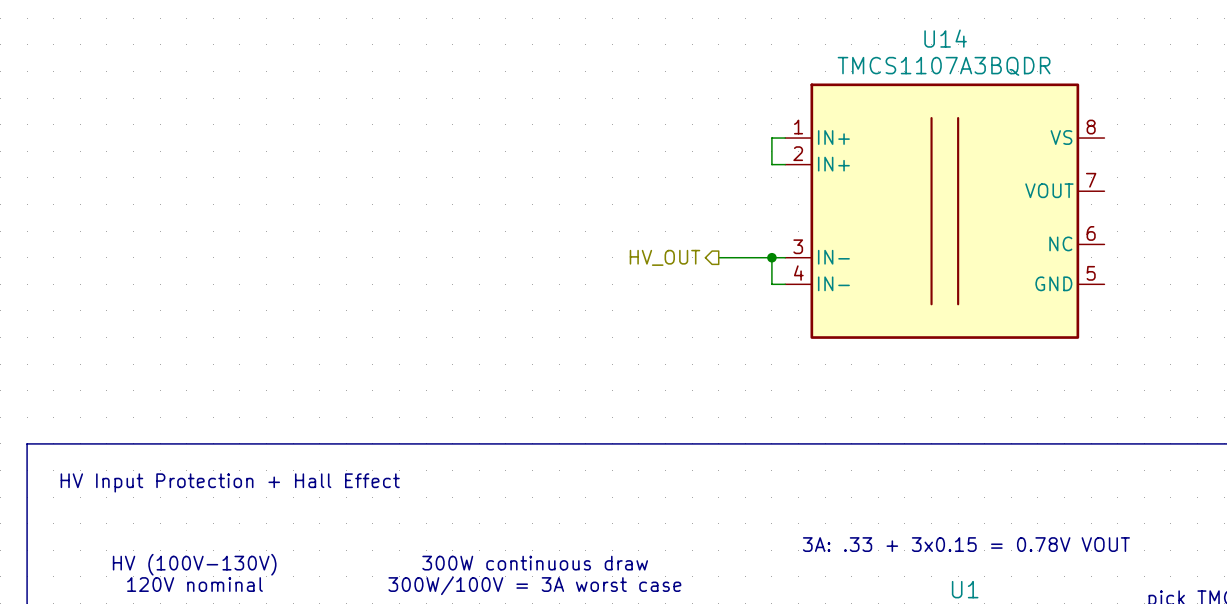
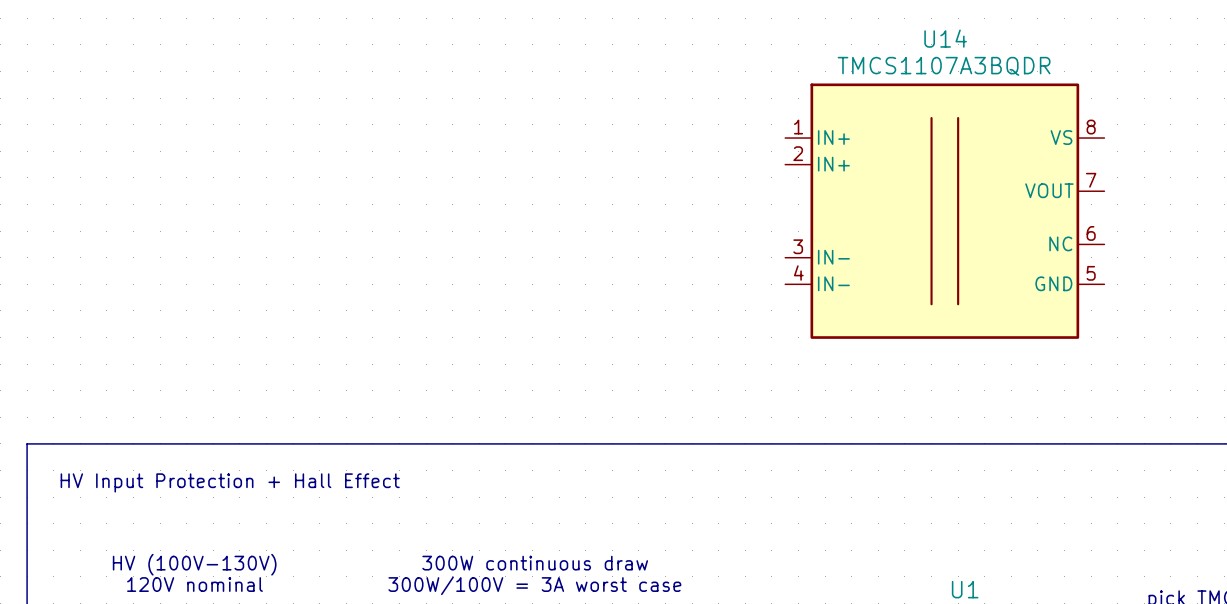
wire: (785, 138) (771, 138) (771, 164) (785, 164) -> none
hierarchical label: HV_OUT (664, 257) -> none
wire: (718, 257) (785, 257) -> none
wire: (771, 257) (771, 284) (785, 284) -> none
junction: (771, 257) -> none
text: 3A: .33 + 3x0.15 = 0.78V VOUT (966, 544) -> none

